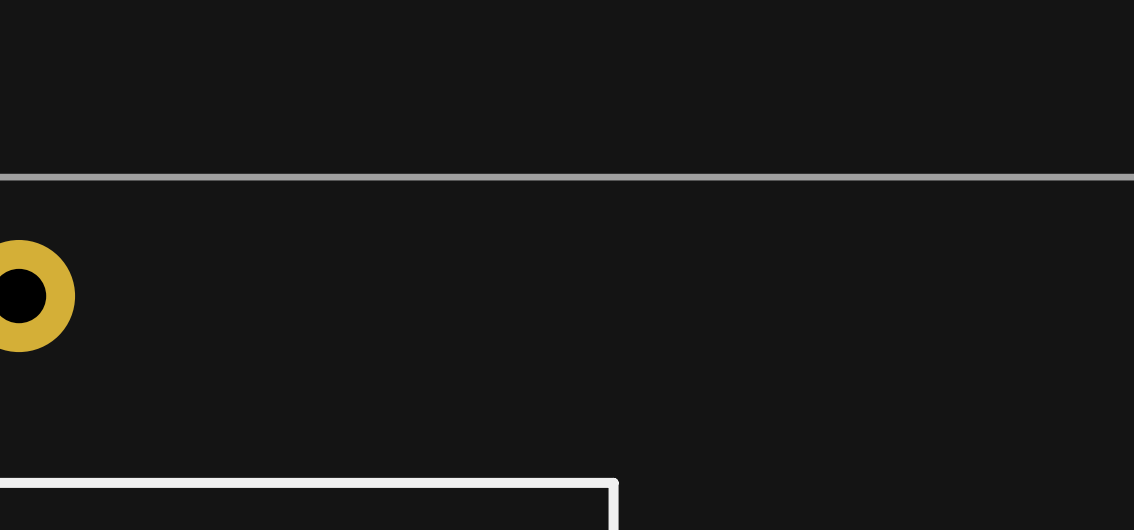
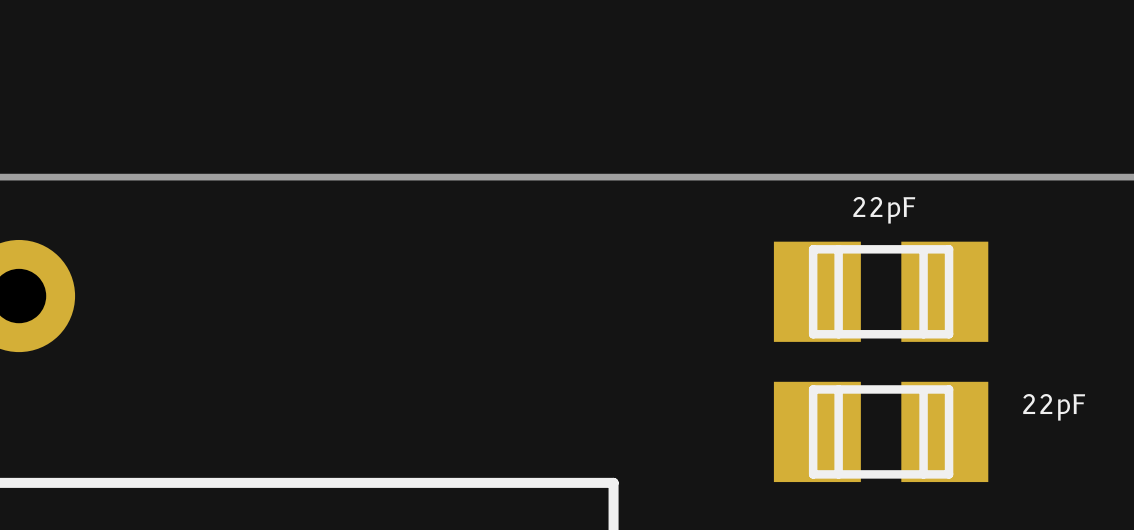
part: none -> 22pF (881, 291)
part: none -> 22pF (881, 431)

